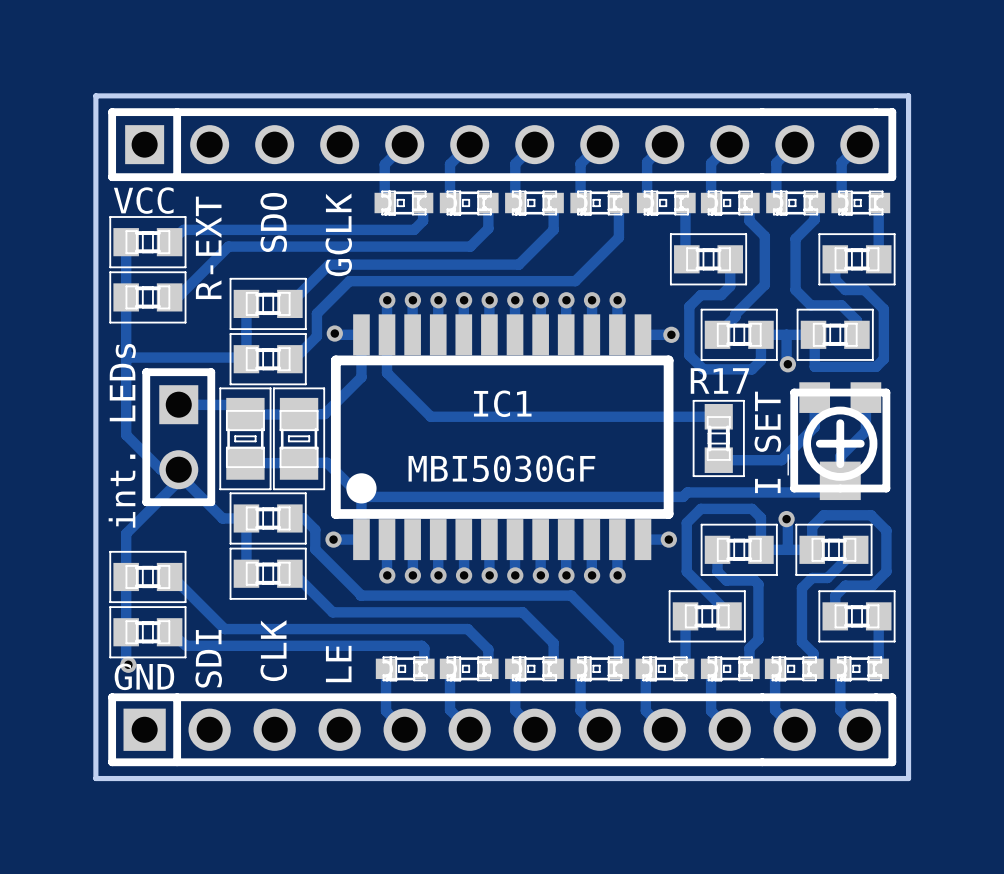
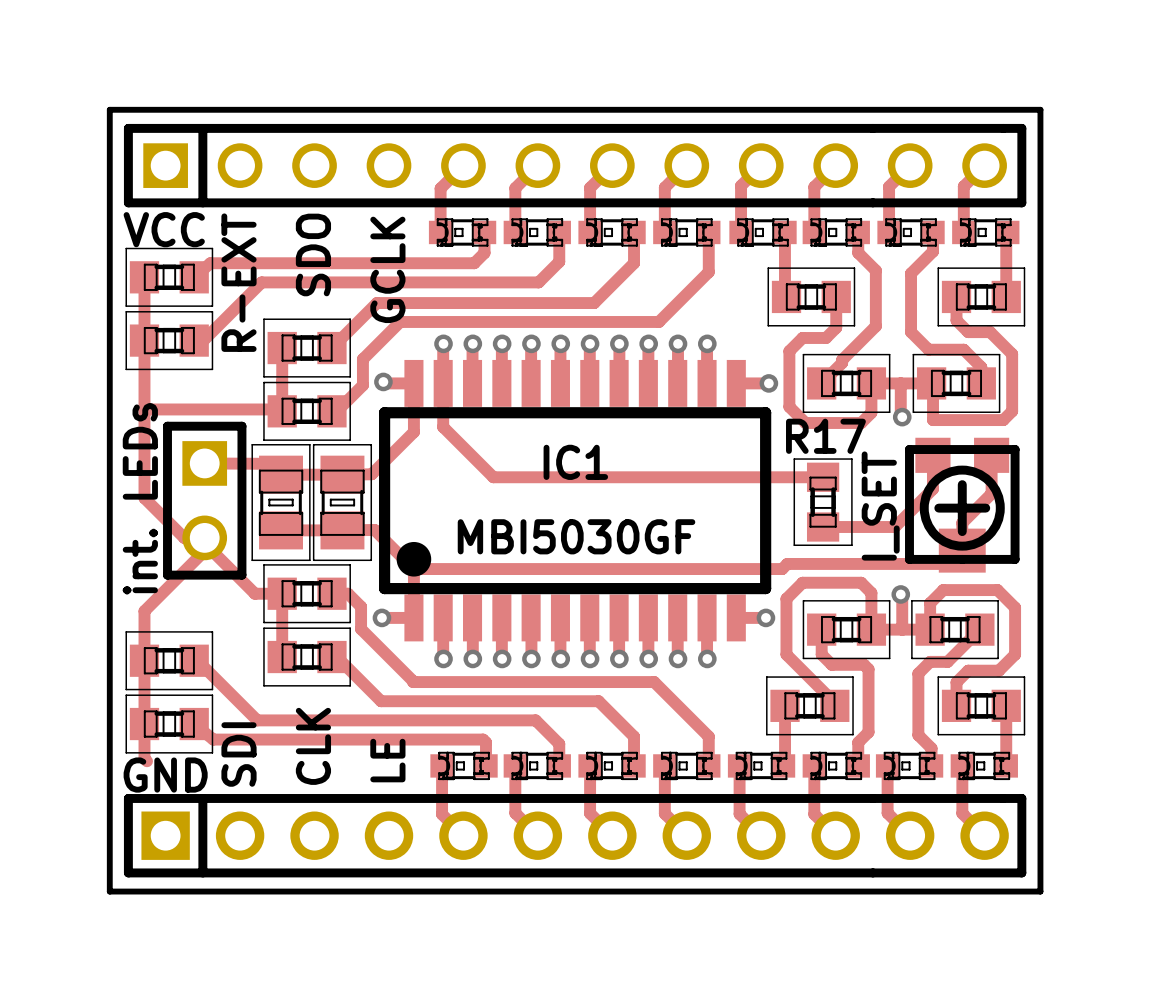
via: (128, 664) -> none

